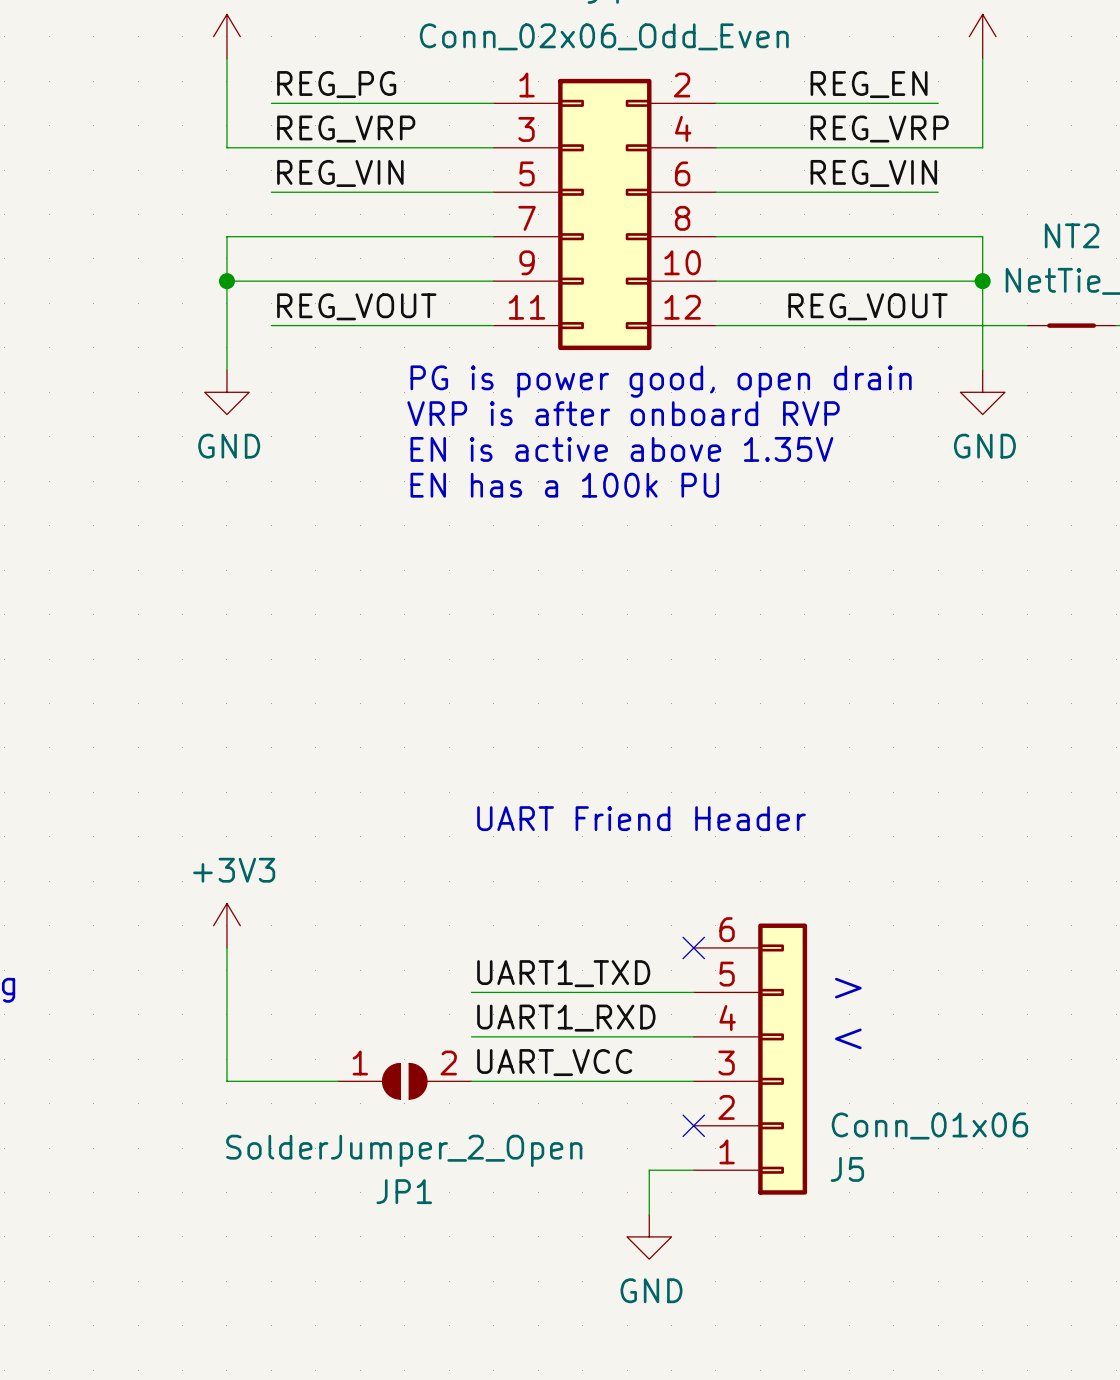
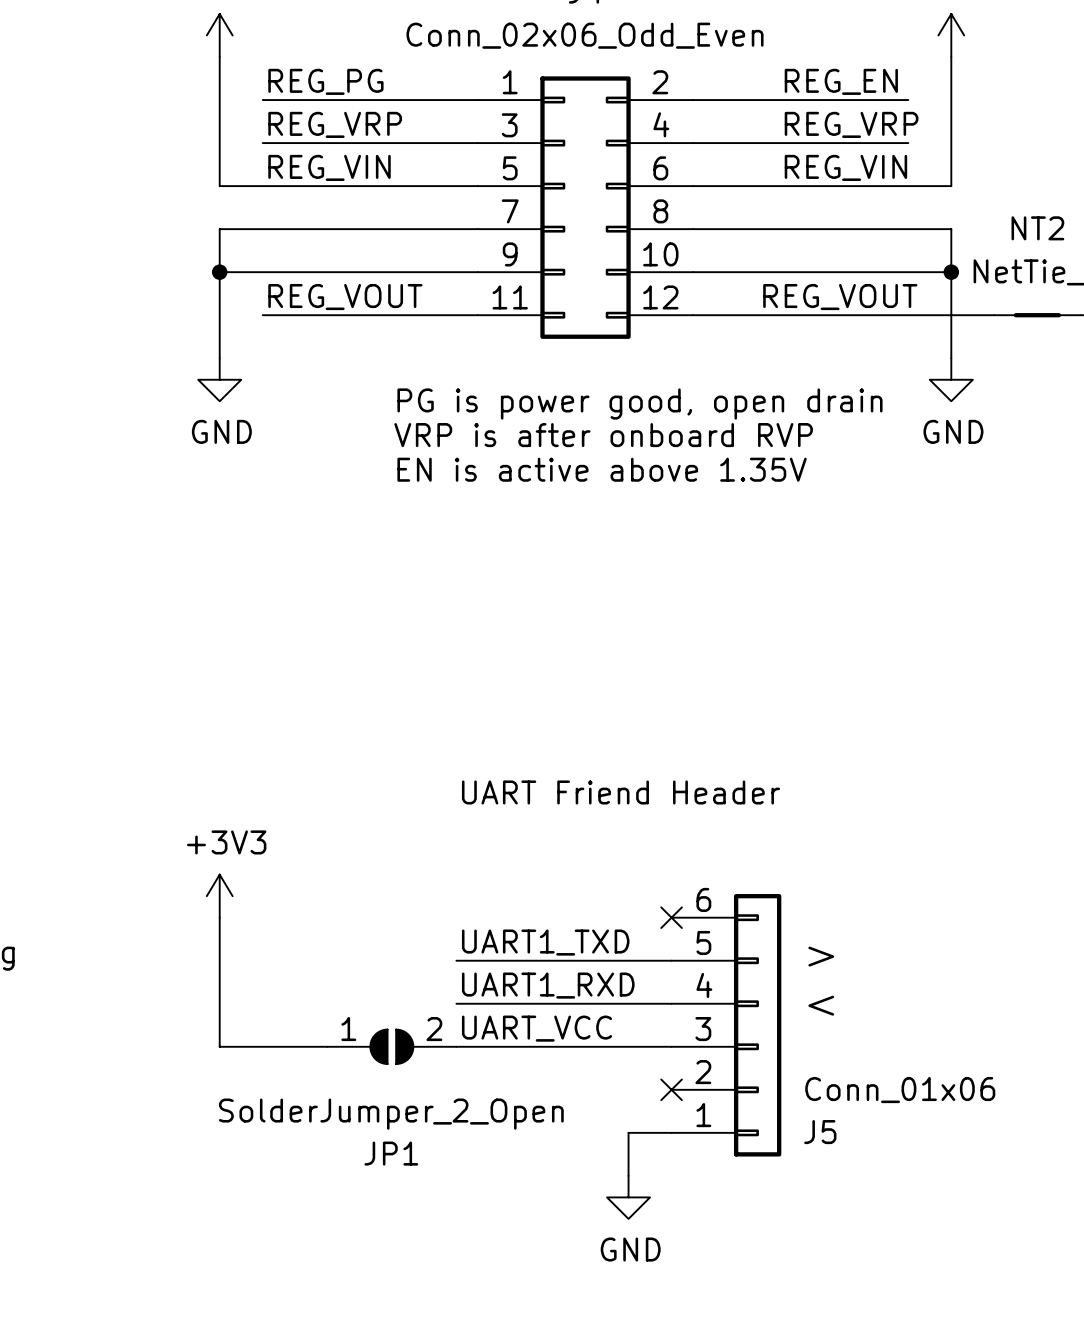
wire: (226, 147) (271, 147) -> (219, 143) (219, 186) (262, 186)
wire: (938, 147) (982, 147) -> (908, 186) (951, 186) (951, 143)
text: PG is power good, open drain (661, 381) -> none
text: VRP is after onboard RVP (623, 413) -> PG is power good, open drain (639, 404)
text: EN is active above 1.35V (621, 449) -> VRP is after onboard RVP (603, 435)
text: EN has a 100k PU (564, 485) -> EN is active above 1.35V (602, 469)

